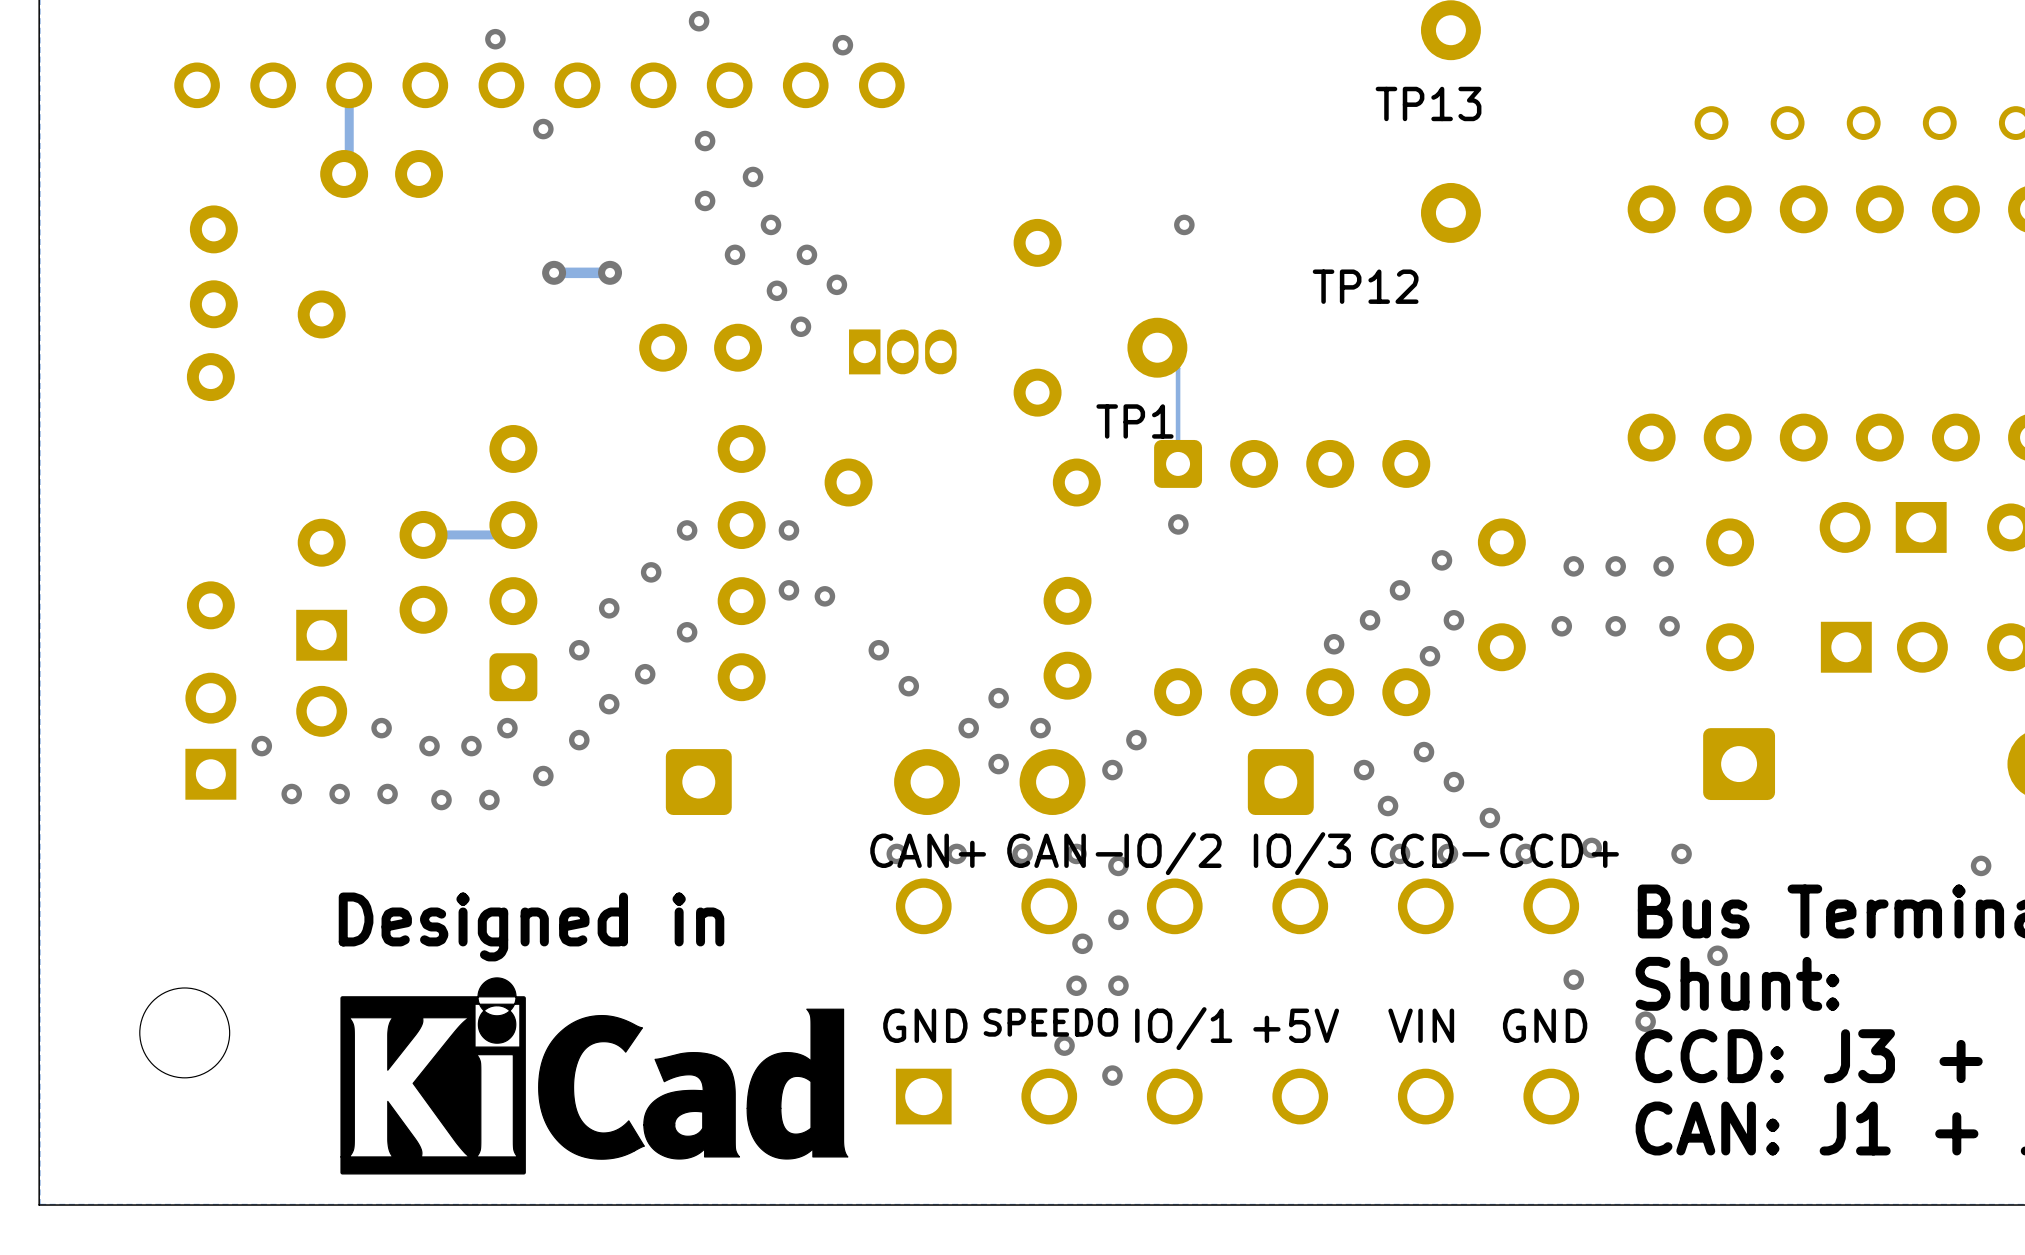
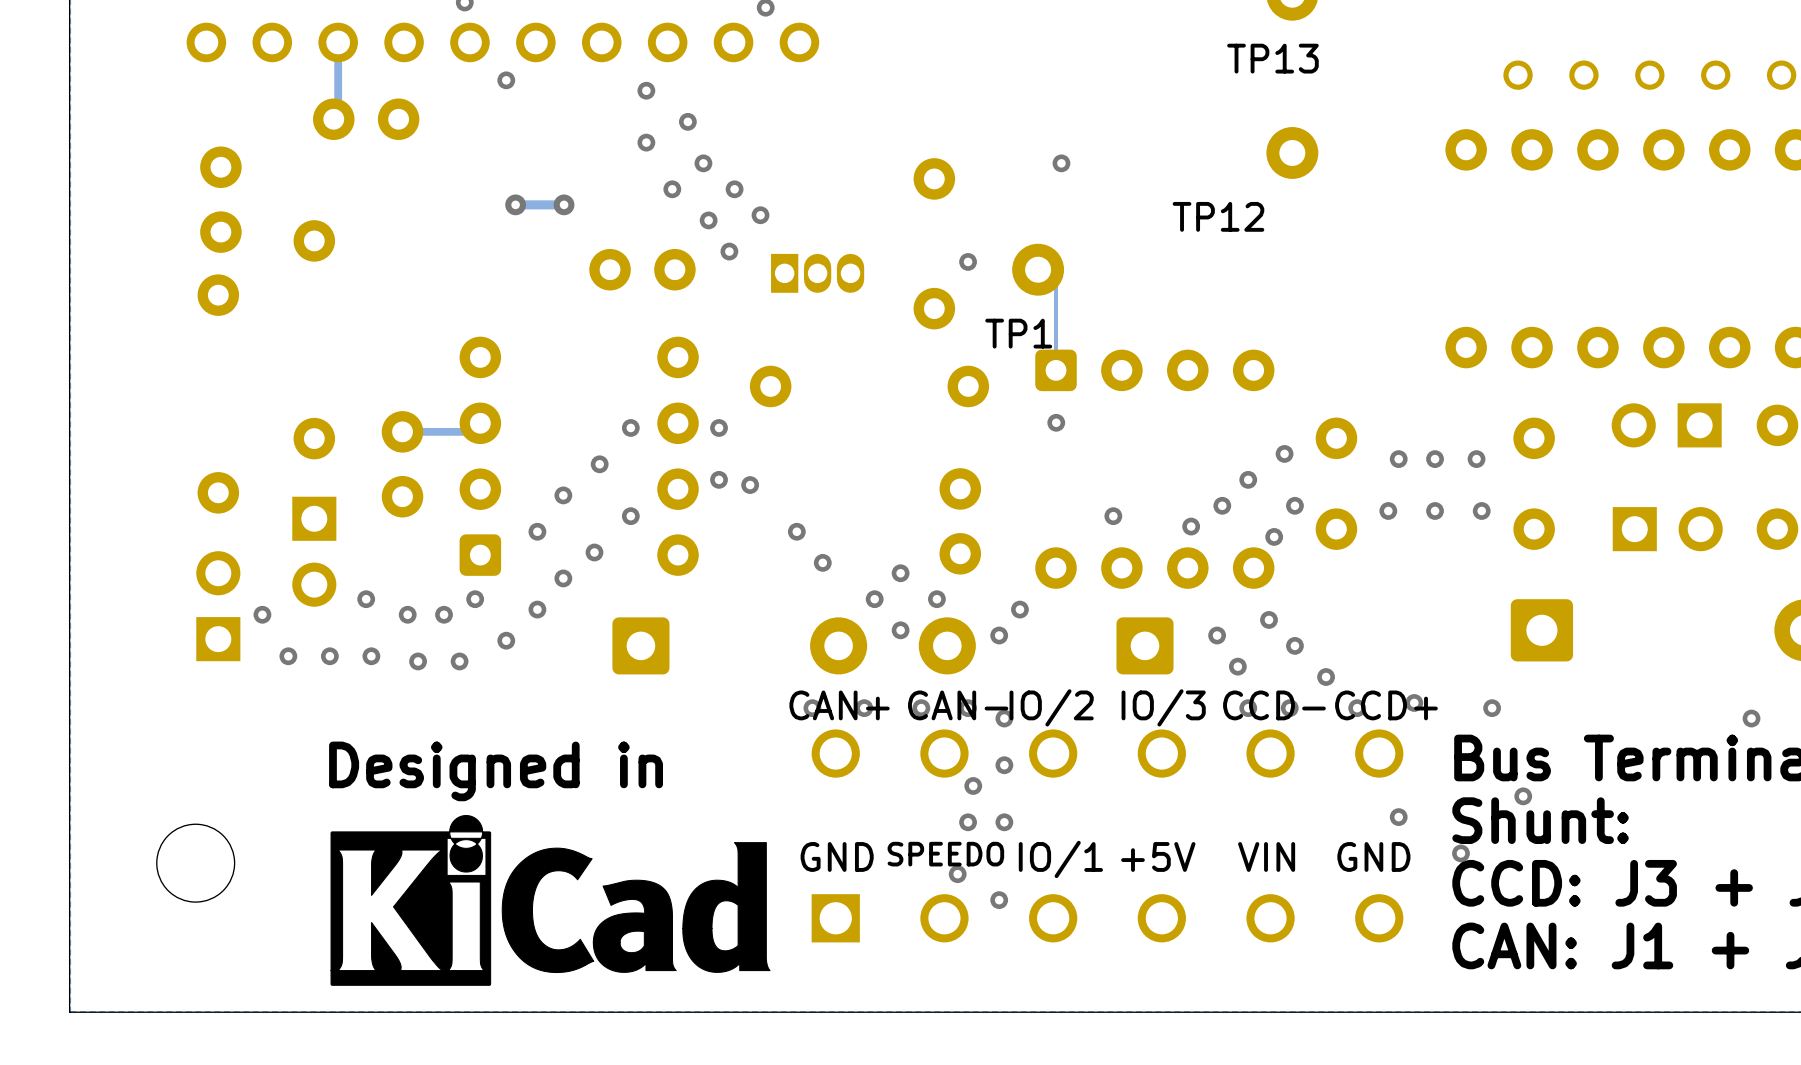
via: none -> (968, 261)
via: none -> (1113, 516)

